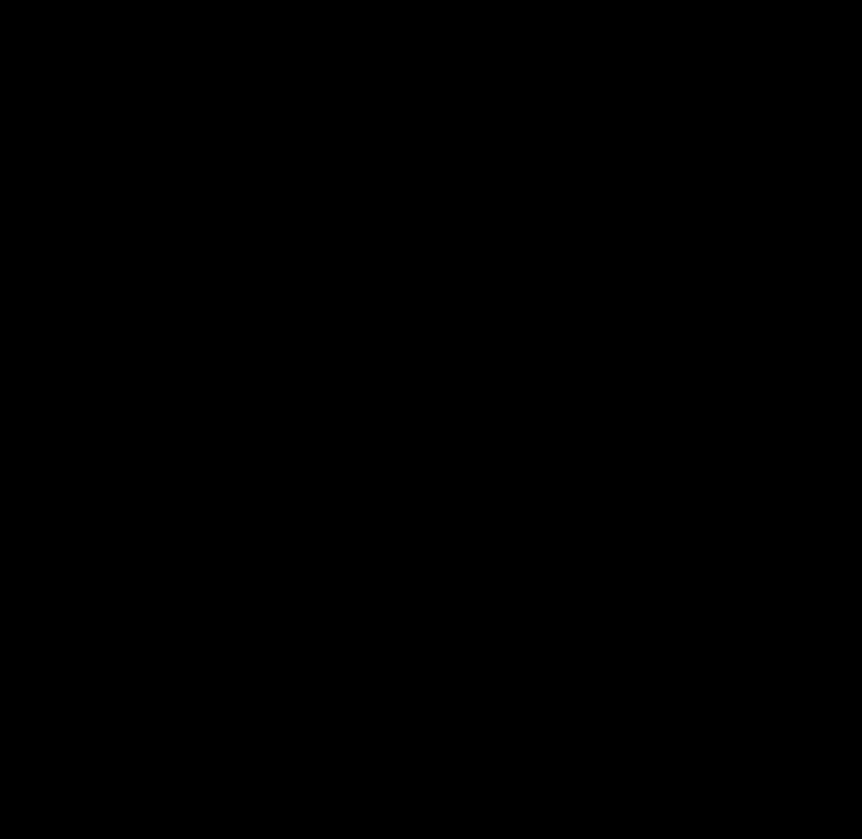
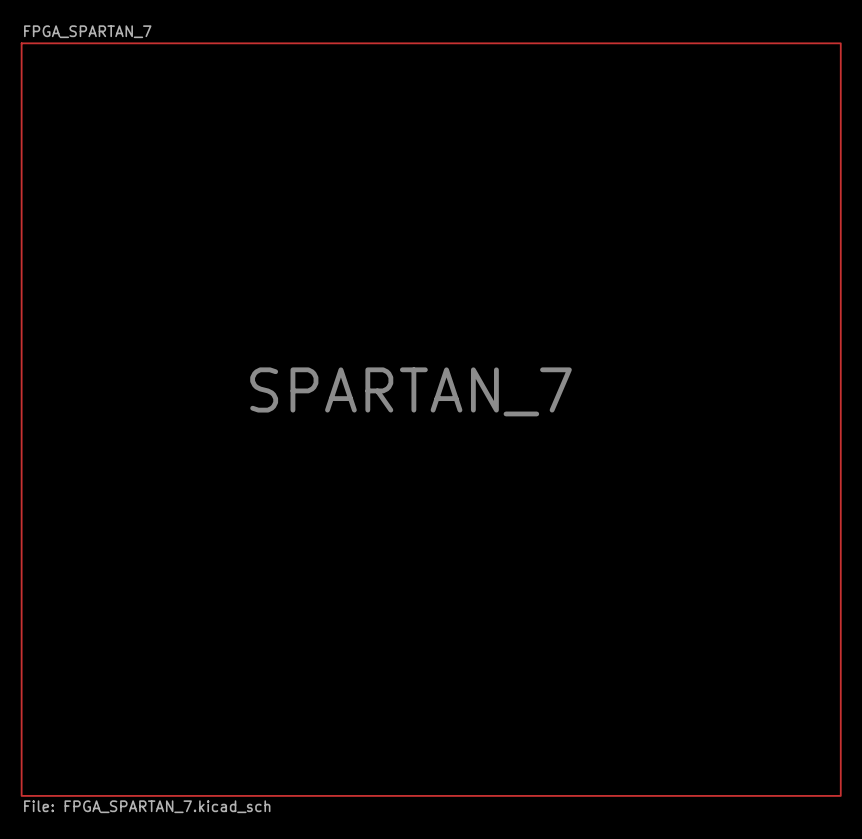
text: none -> SPARTAN_7 (411, 391)
sheet FPGA_SPARTAN_7: none -> File: FPGA_SPARTAN_7.kicad_sch (431, 419)

